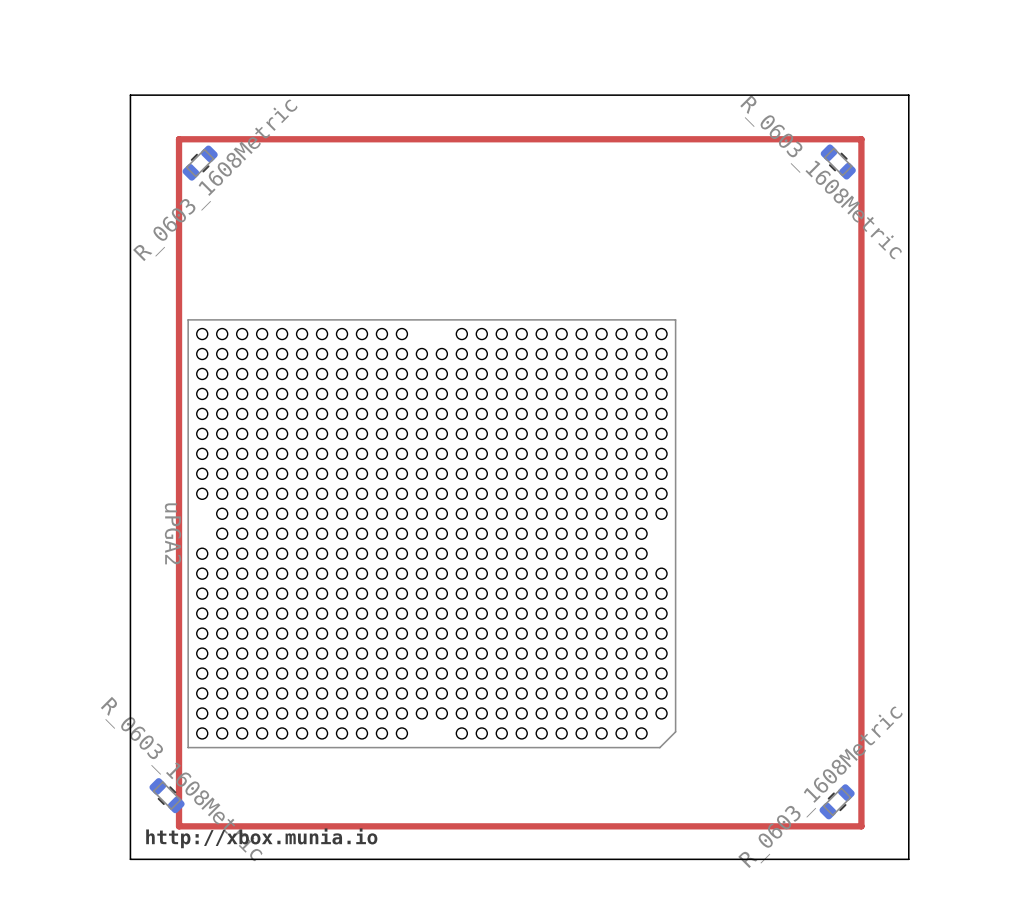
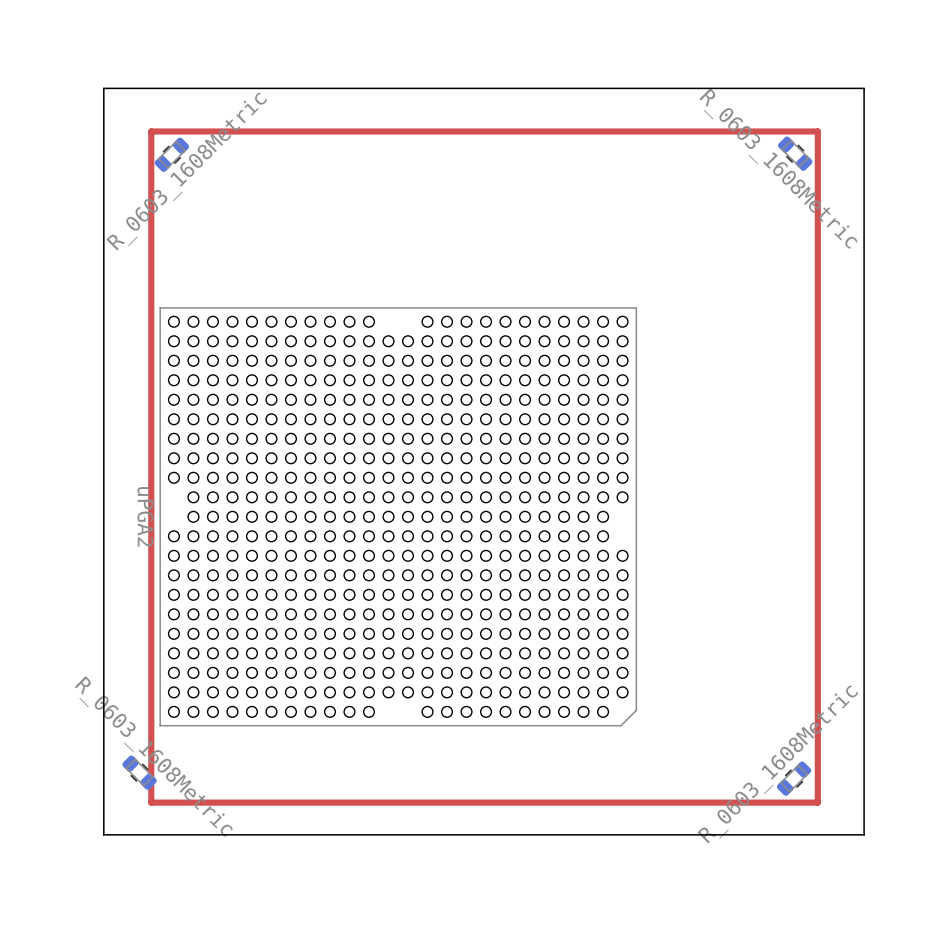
text: http://xbox.munia.io (261, 838) -> none

